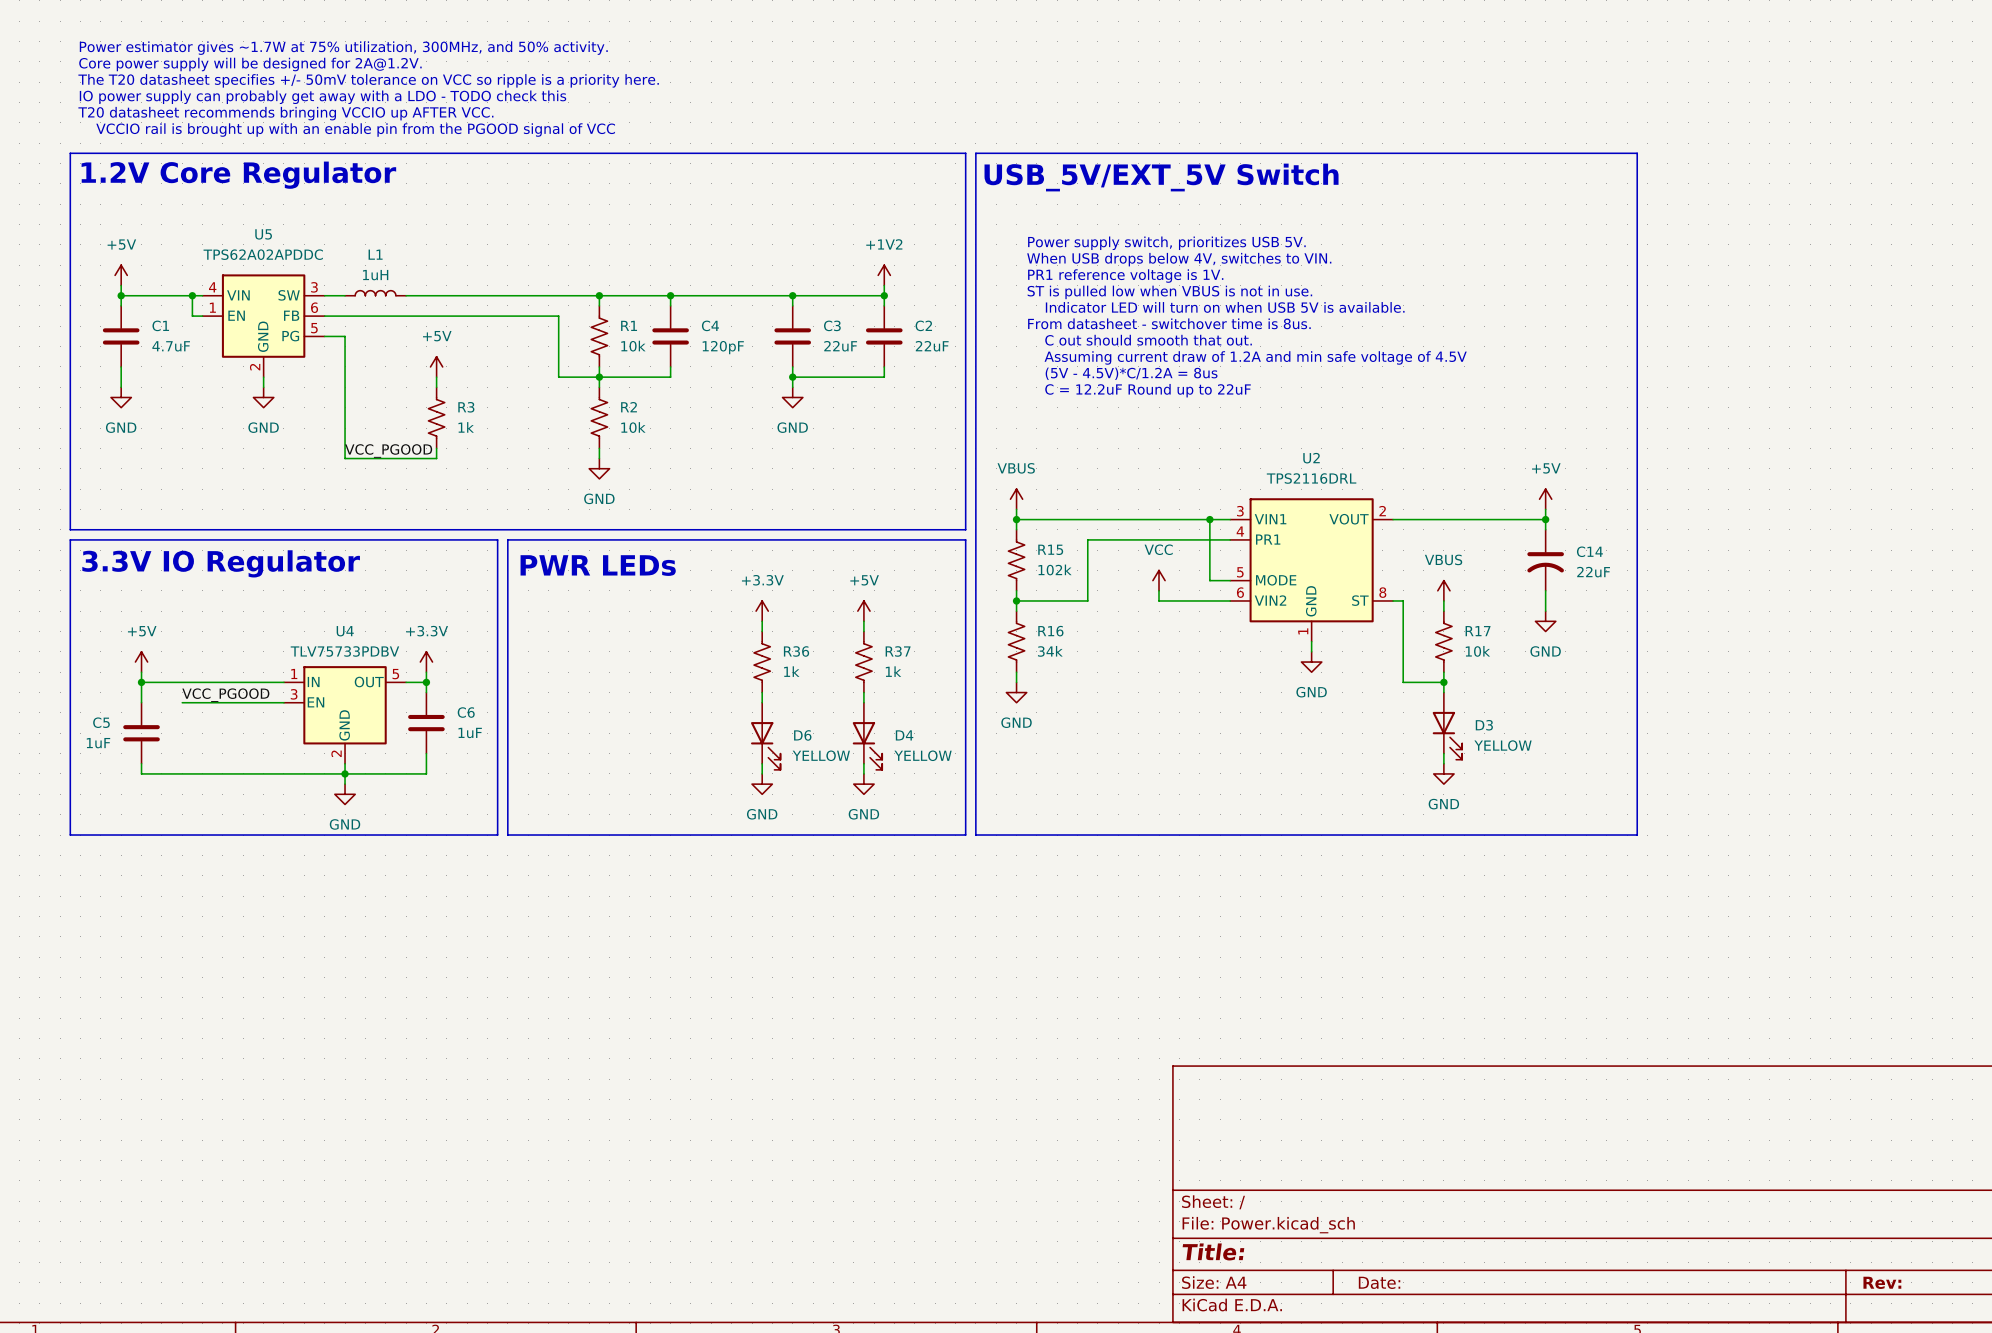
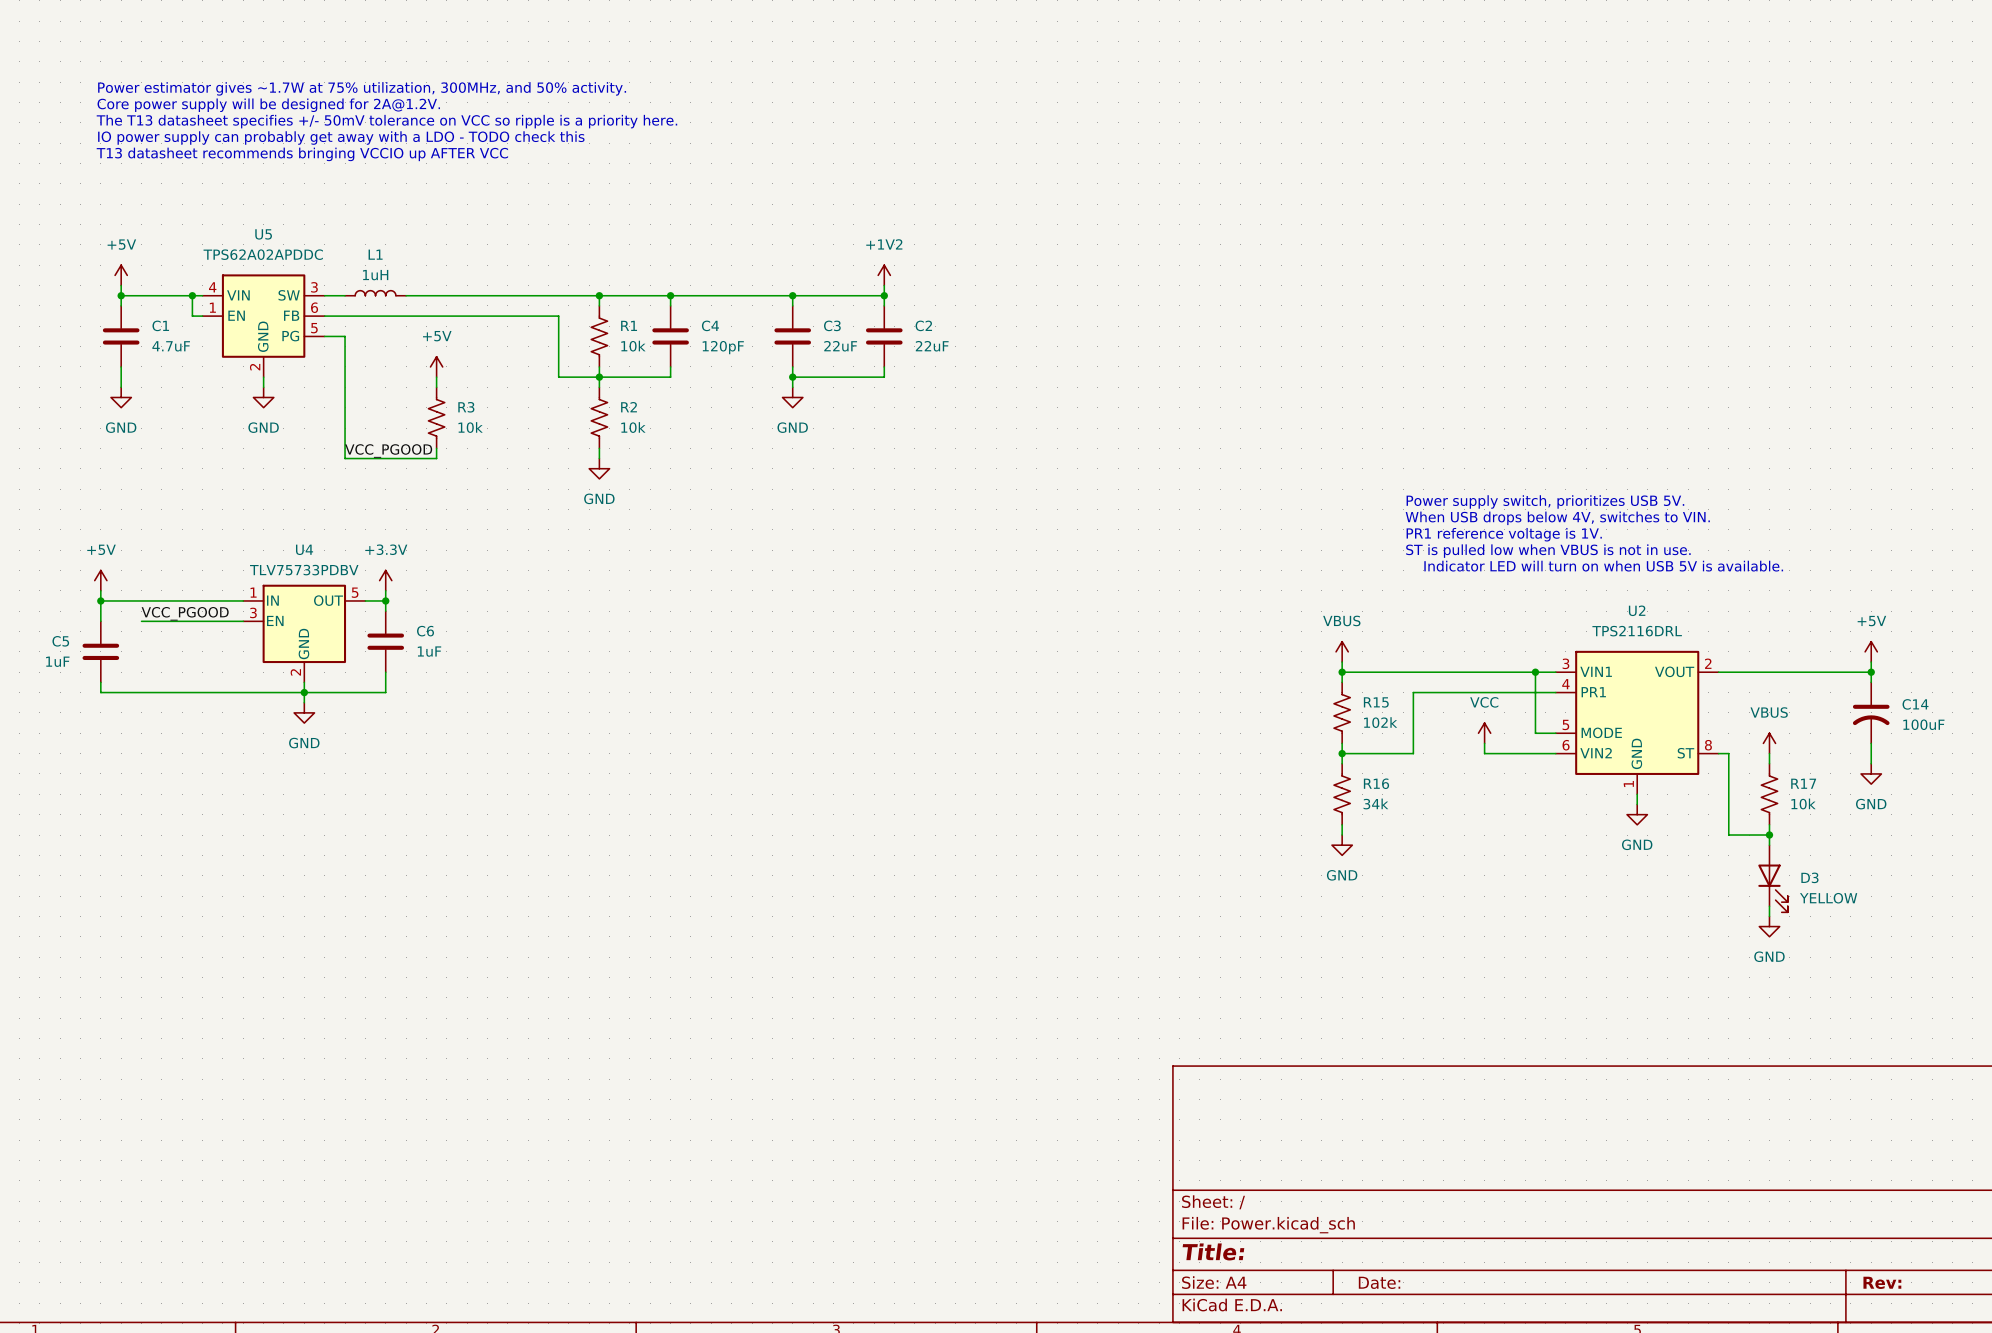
text position: Power estimator gives ~1.7W at 75% utilization, 300MHz, and 50% activity. (343, 48) -> Power estimator gives ~1.7W at 75% utilization, 300MHz, and 50% activity. (362, 88)
text position: Core power supply will be designed for 2A@1.2V. (250, 64) -> Core power supply will be designed for 2A@1.2V. (268, 105)
text: The T20 datasheet specifies +/- 50mV tolerance on VCC so ripple is a priority here. (368, 80) -> none
text position: IO power supply can probably get away with a LDO - TODO check this (323, 97) -> IO power supply can probably get away with a LDO - TODO check this (341, 138)
text: T20 datasheet recommends bringing VCCIO up AFTER VCC. (285, 113) -> none
text: none -> The T13 datasheet specifies +/- 50mV tolerance on VCC so ripple is a priority here. (386, 121)
text: VCCIO rail is brought up with an enable pin from the PGOOD signal of VCC (355, 130) -> none
line: (70, 153) (965, 153) (965, 529) (70, 529) (70, 153) -> none
line: (975, 153) (1637, 153) (1637, 835) (975, 835) (975, 153) -> none
text: none -> T13 datasheet recommends bringing VCCIO up AFTER VCC (302, 154)
text: 1.2V Core Regulator (238, 175) -> none
text: USB_5V/EXT_5V Switch (1161, 177) -> none
text: Power supply switch, prioritizes USB 5V. (1166, 243) -> none
text: When USB drops below 4V, switches to VIN. (1179, 259) -> none
text: PR1 reference voltage is 1V. (1125, 276) -> none
text: ST is pulled low when VBUS is not in use. (1169, 292) -> none
text: Indicator LED will turn on when USB 5V is available. (1225, 307) -> none
text: From datasheet - switchover time is 8us. (1169, 323) -> none
text: C out should smooth that out. (1148, 340) -> none
text: Assuming current draw of 1.2A and min safe voltage of 4.5V (1255, 357) -> none
text: (5V - 4.5V)*C/1.2A = 8us (1131, 373) -> none
text: C = 12.2uF Round up to 22uF (1148, 390) -> none
R3 value: 1k (466, 427) -> 10k (470, 427)
power symbol: VBUS (1016, 499) -> none
power symbol: +5V (1545, 499) -> none
text: none -> Power supply switch, prioritizes USB 5V. (1545, 501)
wire: (1016, 509) (1016, 529) -> none
wire: (1545, 509) (1545, 529) -> none
text: none -> When USB drops below 4V, switches to VIN. (1557, 518)
wire: (1016, 519) (1230, 519) -> none
junction: (1016, 519) -> none
wire: (1209, 519) (1209, 580) (1230, 580) -> none
junction: (1209, 519) -> none
wire: (1393, 519) (1545, 519) -> none
junction: (1545, 519) -> none
text: none -> PR1 reference voltage is 1V. (1504, 534)
line: (70, 539) (497, 539) (497, 835) (70, 835) (70, 539) -> none
line: (507, 539) (965, 539) (965, 835) (507, 835) (507, 539) -> none
wire: (1230, 539) (1087, 539) (1087, 600) (1016, 600) -> none
text: none -> ST is pulled low when VBUS is not in use. (1548, 551)
R15 position: (1016, 560) -> (1342, 712)
C14 position: (1545, 560) -> (1871, 712)
text: 3.3V IO Regulator (221, 563) -> none
text: PWR LEDs (598, 565) -> none
text: none -> Indicator LED will turn on when USB 5V is available. (1603, 566)
U2 position: (1311, 569) -> (1637, 722)
C14 value: 22uF (1593, 572) -> 100uF (1923, 724)
power symbol: VCC (1159, 580) -> none
wire: (1016, 590) (1016, 611) -> none
wire: (1159, 590) (1159, 600) (1230, 600) -> none
power symbol position: VBUS (1443, 590) -> VBUS (1342, 651)
wire: (1545, 590) (1545, 611) -> none
junction: none -> (100, 600)
junction: none -> (385, 600)
junction: (1016, 600) -> none
wire: (1393, 600) (1403, 600) (1403, 682) (1443, 682) -> none
wire: (1443, 600) (1443, 611) -> none
power symbol: +3.3V (762, 611) -> none
power symbol: +5V (863, 611) -> none
wire: (762, 621) (762, 631) -> none
wire: (863, 621) (863, 631) -> none
power symbol: GND (1545, 621) -> none
R16 position: (1016, 641) -> (1342, 794)
wire: (1311, 641) (1311, 651) -> none
R17 position: (1443, 641) -> (1769, 794)
power symbol: none -> +5V (1871, 651)
power symbol position: +5V (141, 662) -> +5V (100, 580)
power symbol position: +3.3V (426, 662) -> +3.3V (385, 580)
R36: 1k (762, 662) -> none
R37: 1k (863, 662) -> none
power symbol: GND (1311, 662) -> none
wire: none -> (1342, 662) (1342, 682)
wire: none -> (1871, 662) (1871, 682)
wire: (141, 672) (141, 702) -> (100, 590) (100, 621)
wire: (426, 672) (426, 692) -> (385, 590) (385, 611)
wire: (1016, 672) (1016, 682) -> none
wire: none -> (1342, 672) (1555, 672)
junction: none -> (1342, 672)
wire: (1443, 672) (1443, 692) -> (1342, 743) (1342, 763)
wire: none -> (1535, 672) (1535, 733) (1555, 733)
junction: none -> (1535, 672)
wire: none -> (1718, 672) (1871, 672)
junction: none -> (1871, 672)
wire: (141, 682) (283, 682) -> (100, 600) (243, 600)
junction: (141, 682) -> none
wire: (406, 682) (426, 682) -> (365, 600) (385, 600)
junction: (426, 682) -> none
junction: (1443, 682) -> none
junction: none -> (304, 692)
wire: (762, 692) (762, 702) -> none
wire: (863, 692) (863, 702) -> none
power symbol: GND (1016, 692) -> none
wire: none -> (1555, 692) (1413, 692) (1413, 753) (1342, 753)
label position: VCC_PGOOD (225, 695) -> VCC_PGOOD (185, 613)
wire: (182, 702) (283, 702) -> (141, 621) (243, 621)
U4 position: (345, 714) -> (304, 633)
C6 position: (426, 723) -> (385, 641)
D3 position: (1447, 726) -> (1773, 878)
C5 position: (141, 733) -> (100, 651)
power symbol: none -> VCC (1484, 733)
D6: YELLOW (765, 736) -> none
D4: YELLOW (867, 736) -> none
wire: none -> (1484, 743) (1484, 753) (1555, 753)
power symbol: none -> VBUS (1769, 743)
wire: none -> (1871, 743) (1871, 763)
wire: (426, 753) (426, 773) (141, 773) (141, 763) -> (385, 672) (385, 692) (100, 692) (100, 682)
junction: none -> (1342, 753)
wire: (1443, 753) (1443, 763) -> (1342, 824) (1342, 835)
wire: none -> (1718, 753) (1728, 753) (1728, 835) (1769, 835)
wire: none -> (1769, 753) (1769, 763)
wire: (762, 763) (762, 773) -> none
wire: (863, 763) (863, 773) -> none
junction: (345, 773) -> none
power symbol: GND (1443, 773) -> none
power symbol: none -> GND (1871, 773)
power symbol: GND (762, 784) -> none
power symbol: GND (863, 784) -> none
power symbol position: GND (345, 794) -> GND (304, 712)
power symbol: none -> GND (1637, 814)
wire: none -> (1769, 824) (1769, 845)
junction: none -> (1769, 835)
power symbol: none -> GND (1342, 845)
wire: none -> (1769, 906) (1769, 916)
power symbol: none -> GND (1769, 926)

